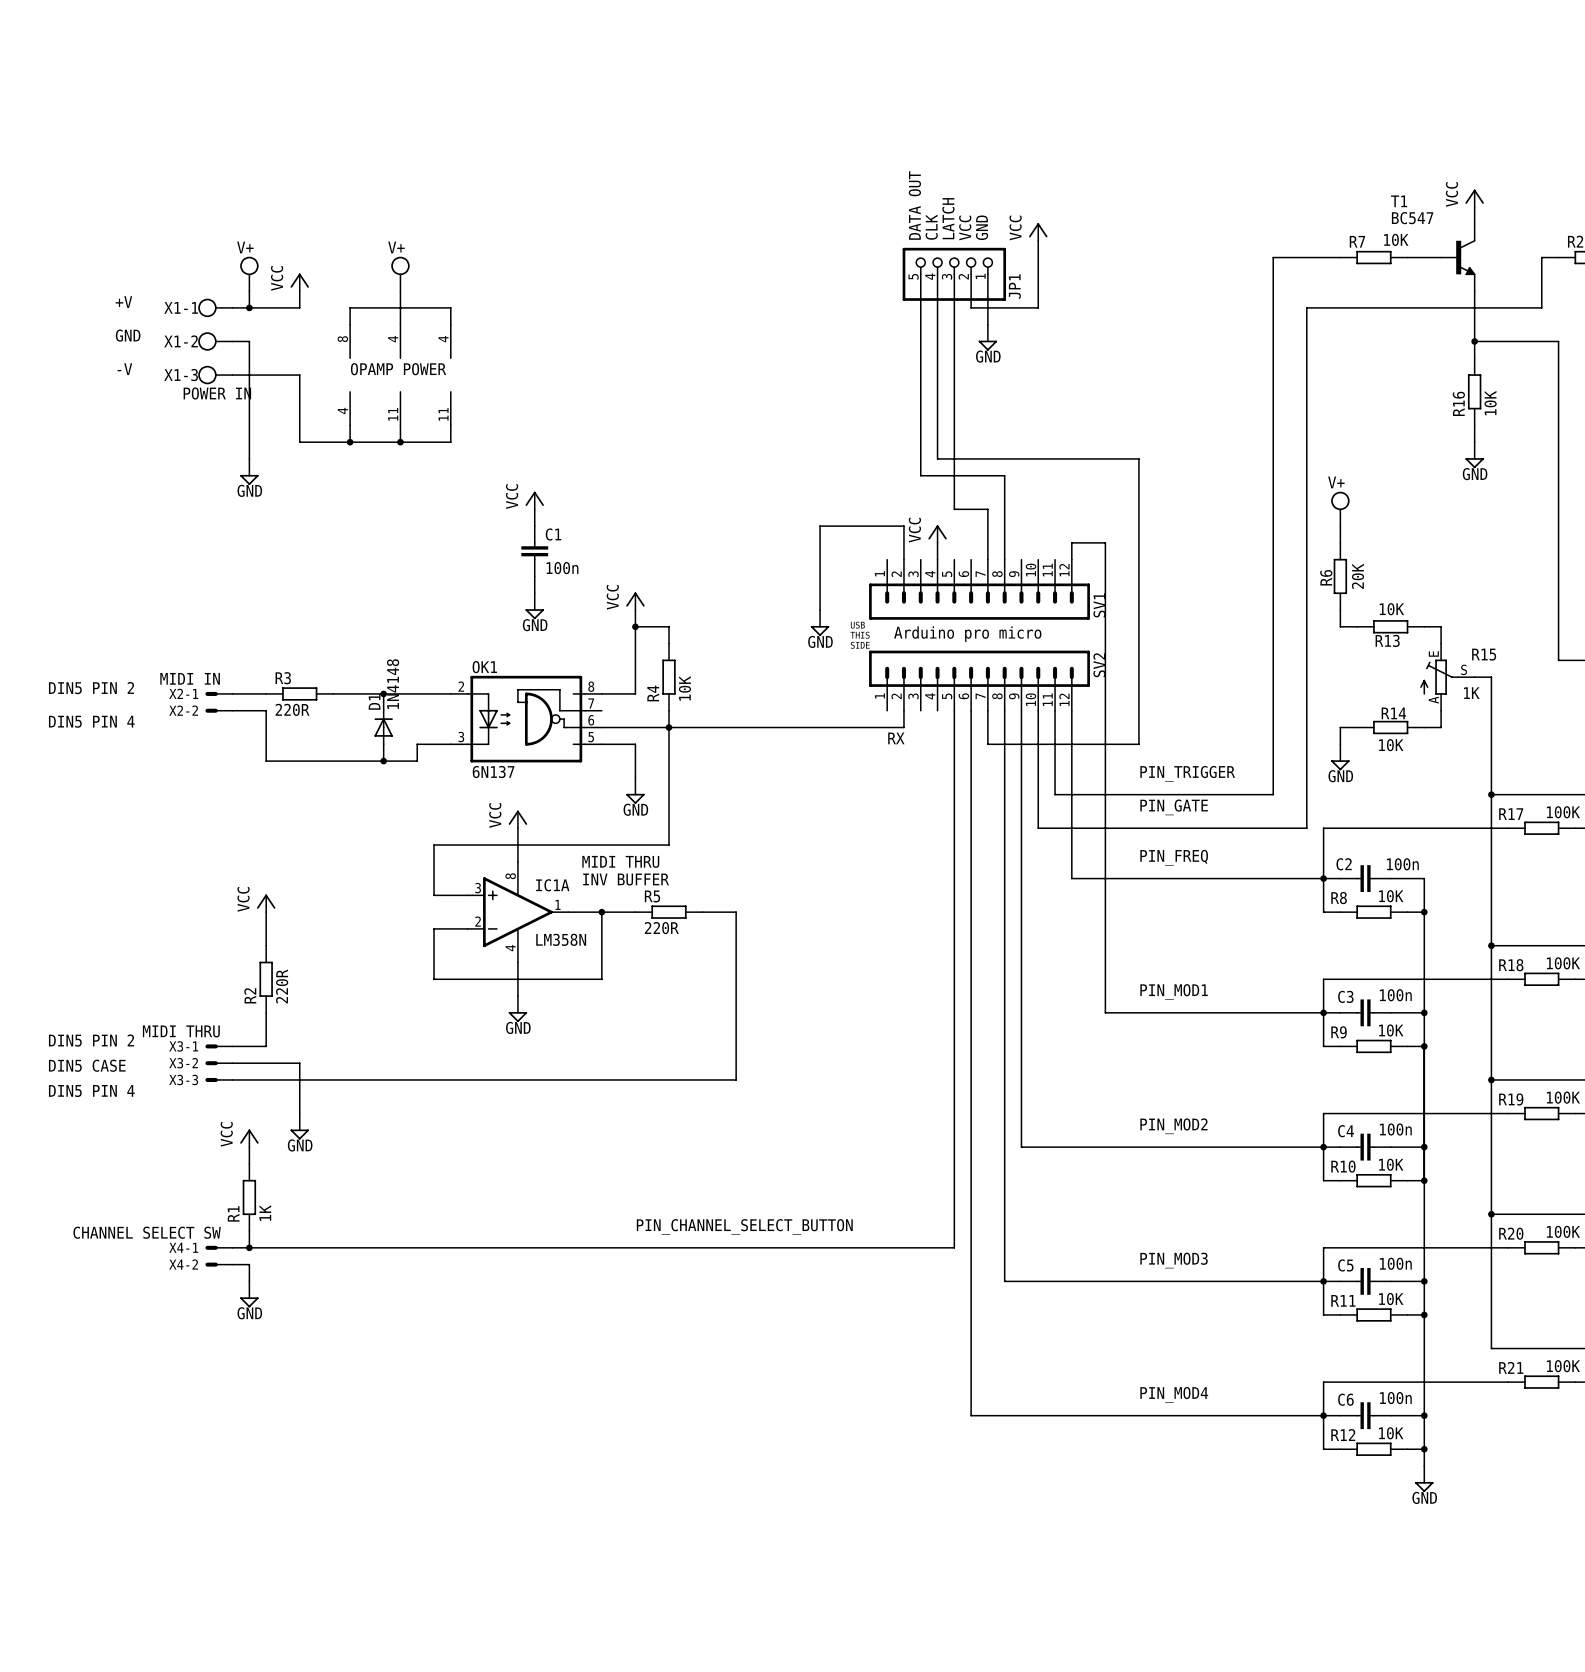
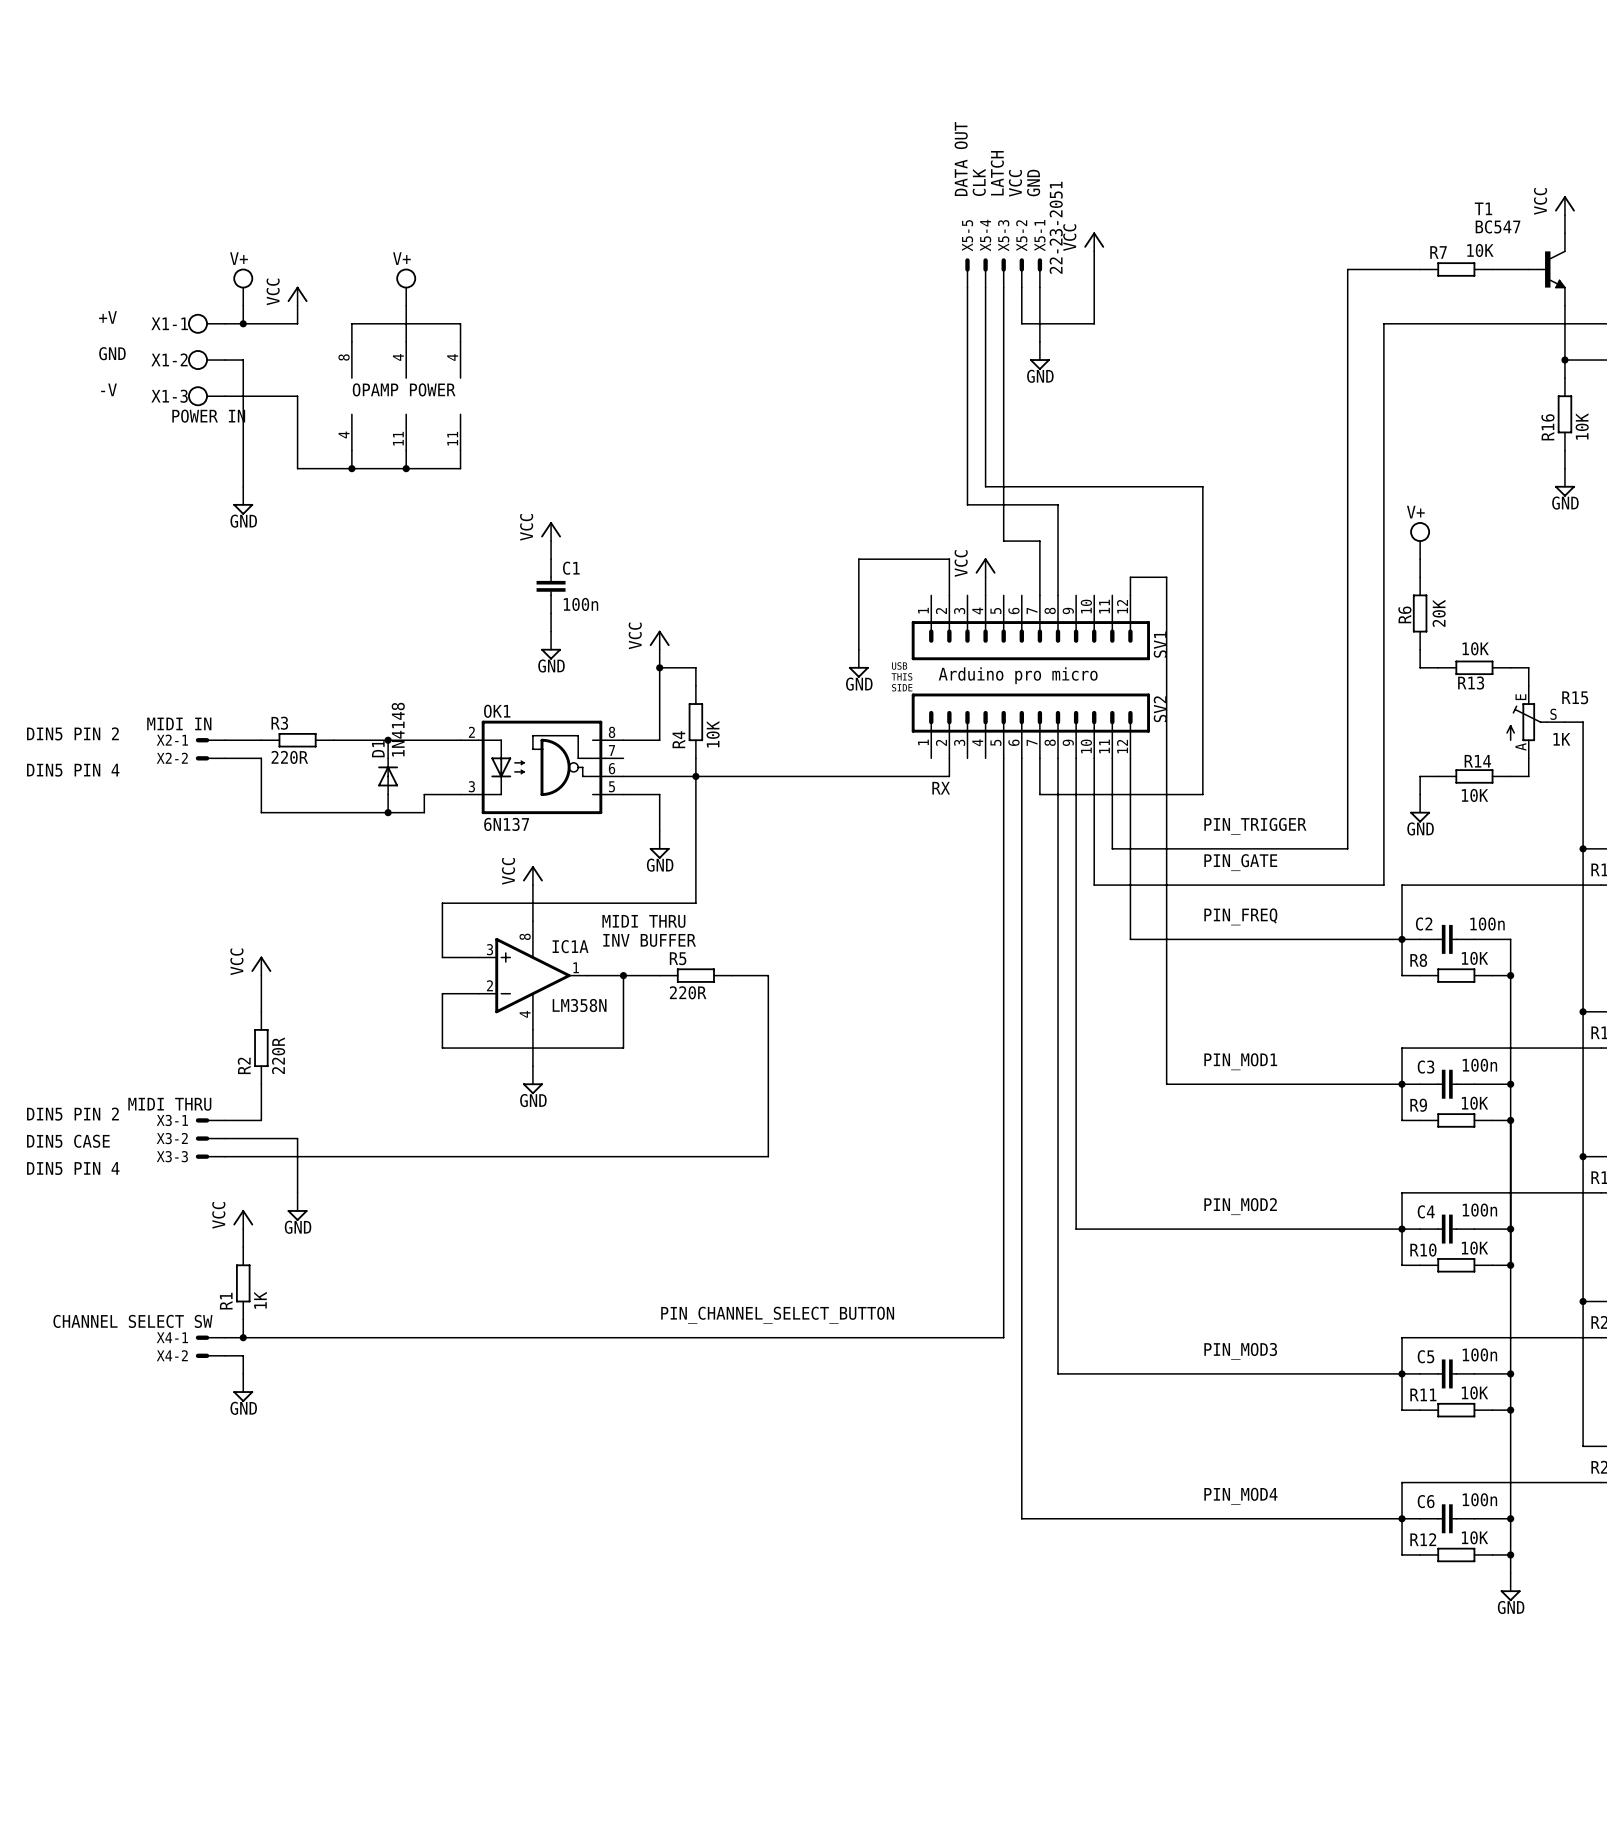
text position: DATA OUT (914, 205) -> DATA OUT (961, 159)
text position: LATCH (948, 218) -> LATCH (997, 173)
text position: CLK (931, 227) -> CLK (979, 182)
text position: GND (982, 227) -> GND (1033, 183)
text position: VCC (965, 228) -> VCC (1015, 183)
X5-5: none -> (967, 272)
X5-4: none -> (985, 272)
X5-3: none -> (1003, 272)
X5-2: none -> (1021, 272)
X5-1: none -> 22-23-2051 (1039, 272)
JP1: (954, 274) -> none

